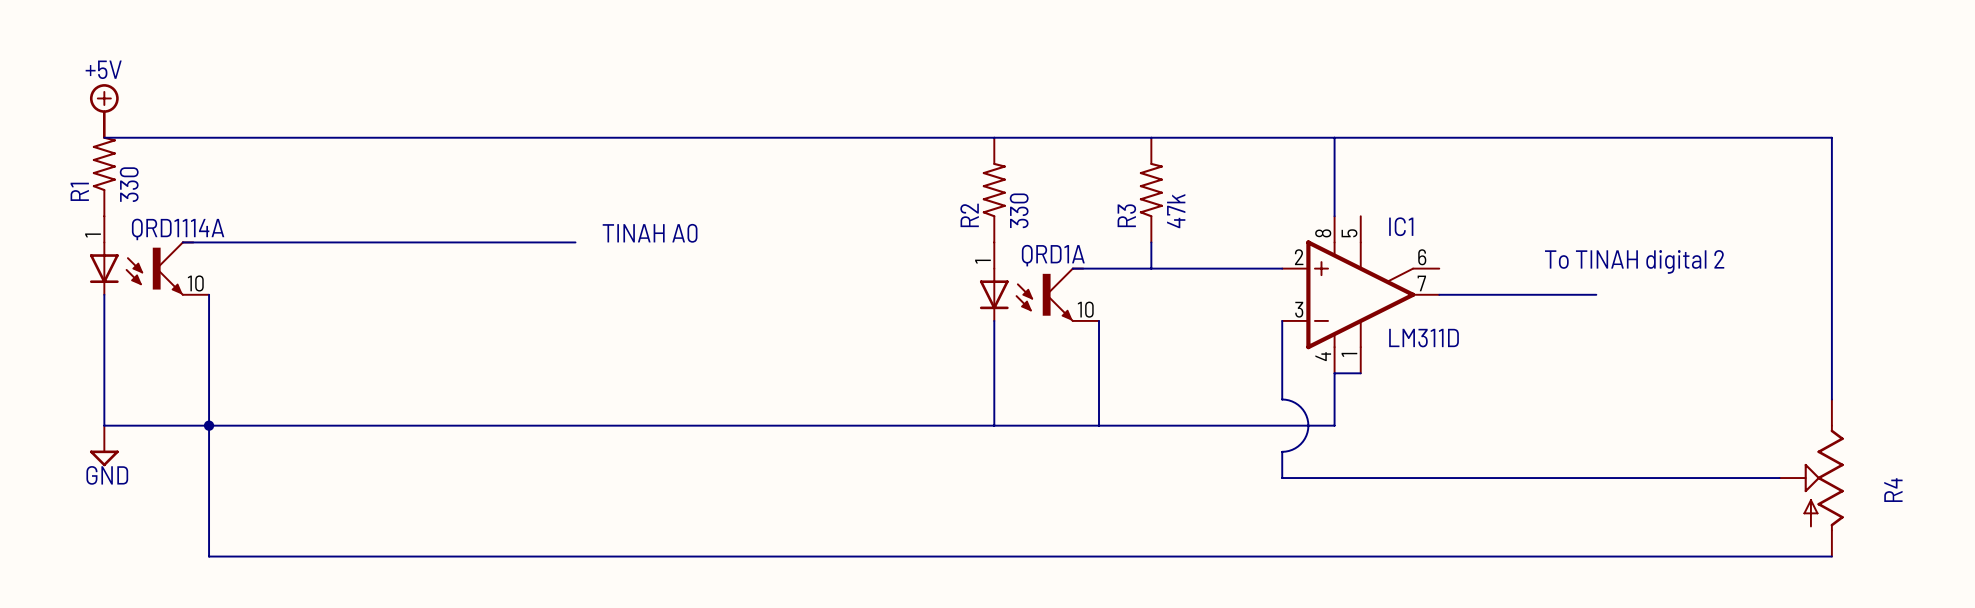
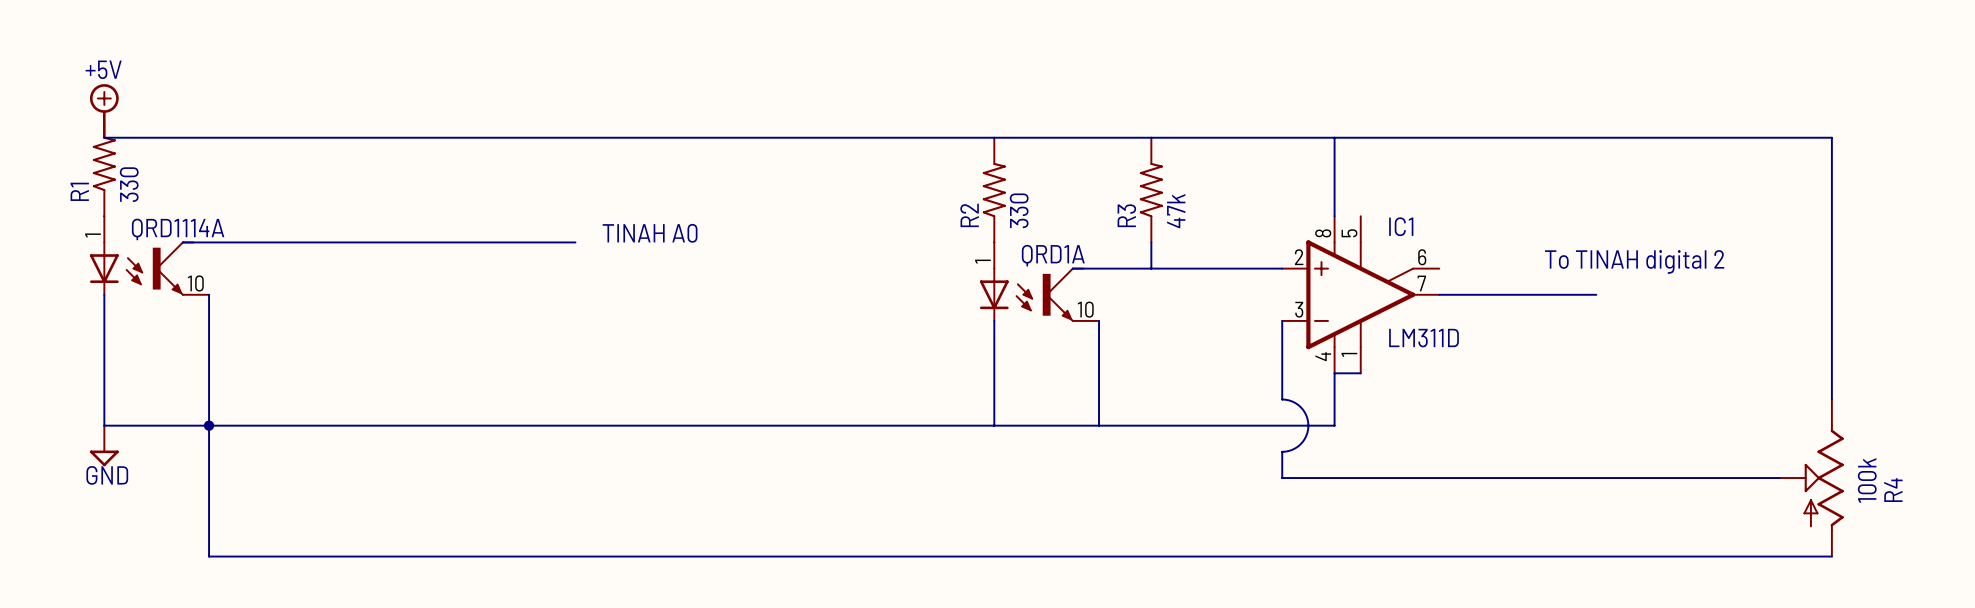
R4 value: none -> 100k (1867, 480)

